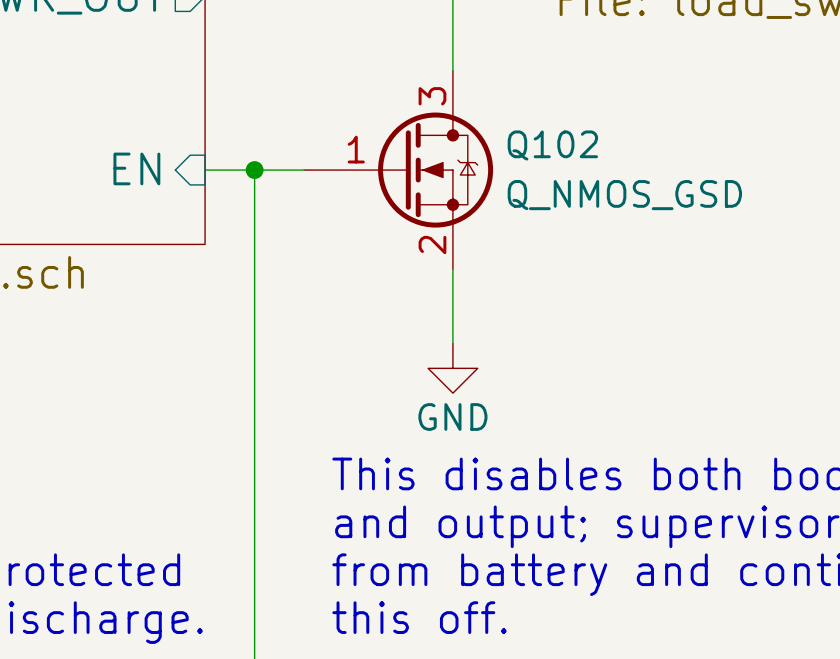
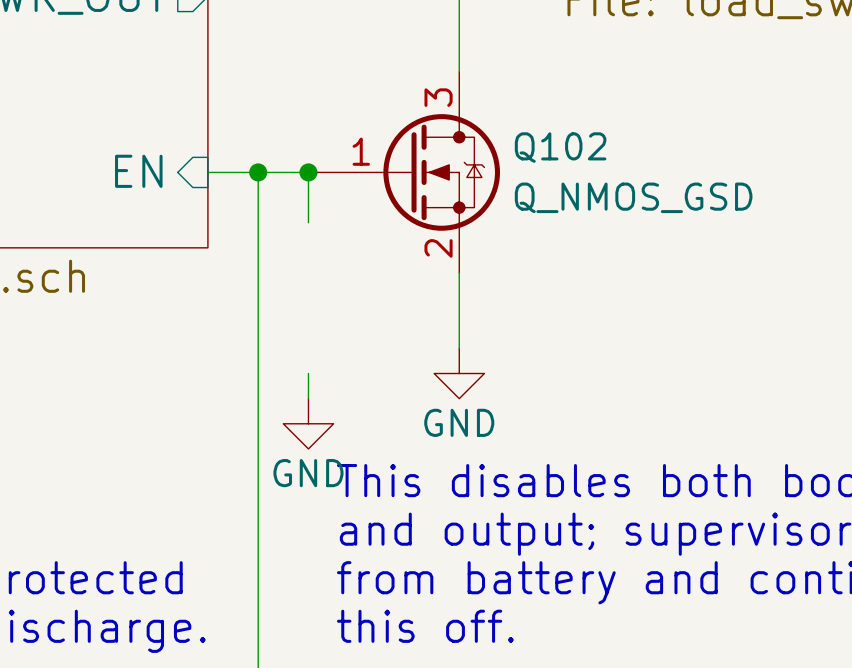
wire: none -> (308, 172) (308, 222)
junction: none -> (308, 172)
wire: none -> (308, 373) (308, 398)
power symbol: none -> GND (308, 423)

